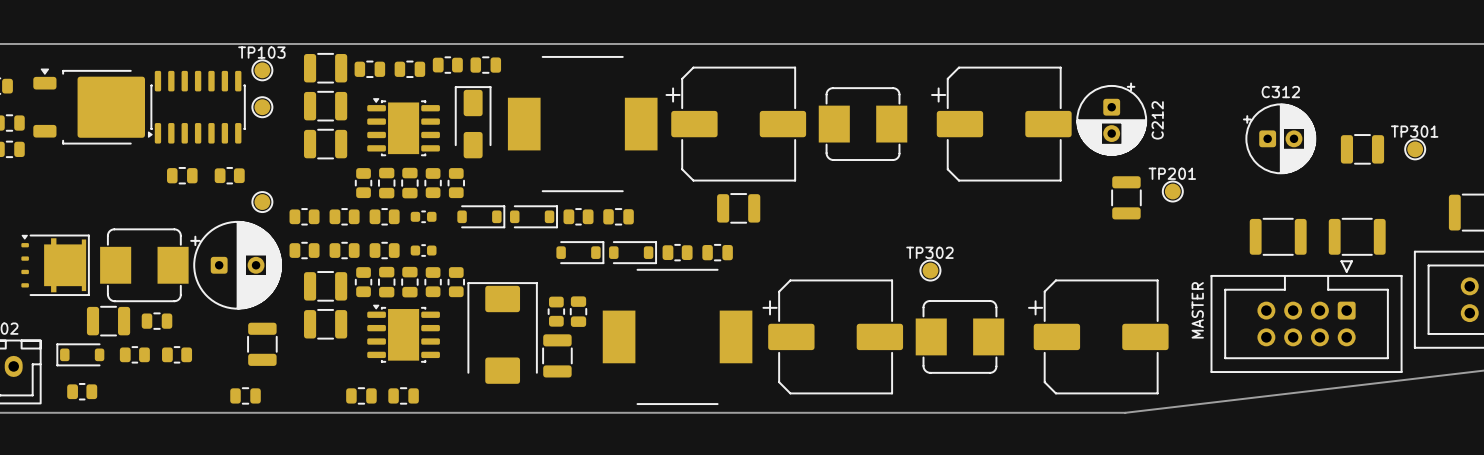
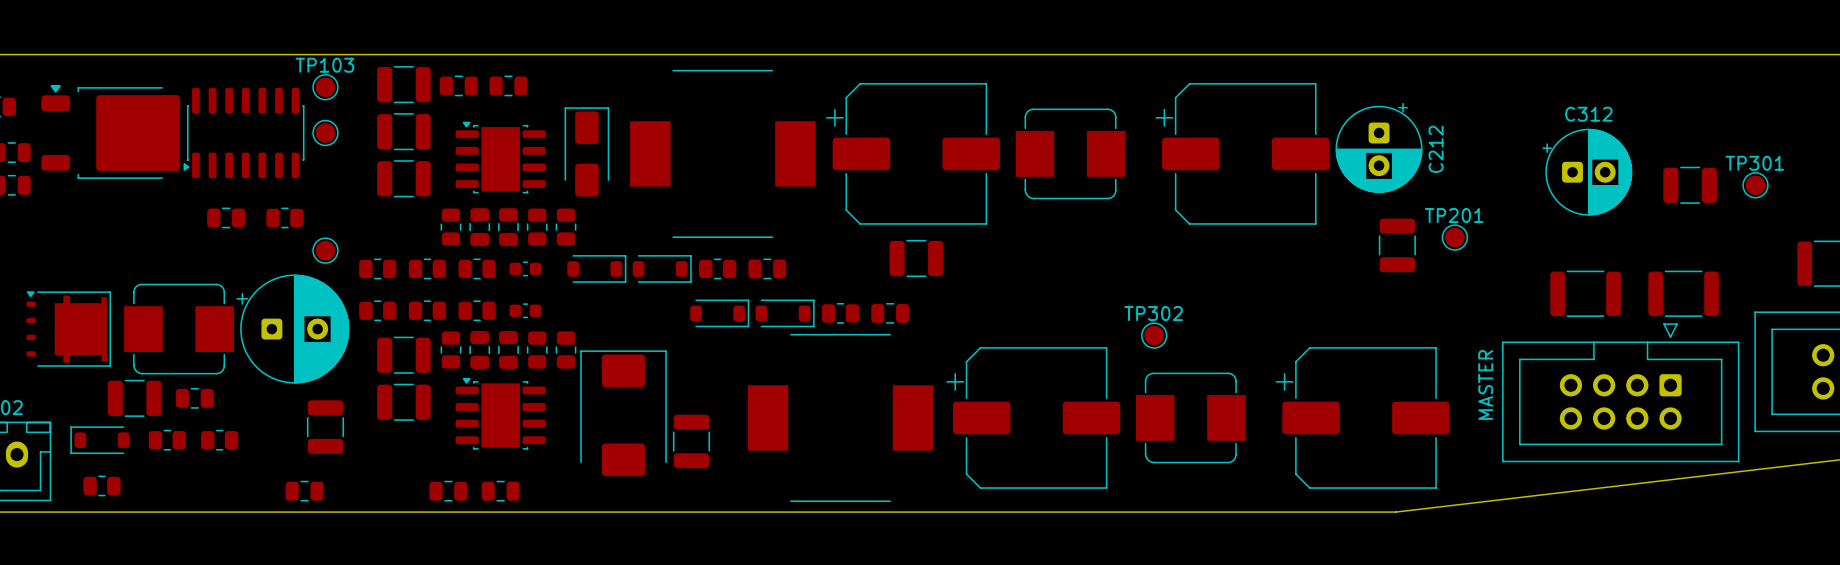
part: (447, 65) -> none
part: (485, 65) -> none
part: (556, 311) -> none
part: (578, 311) -> none

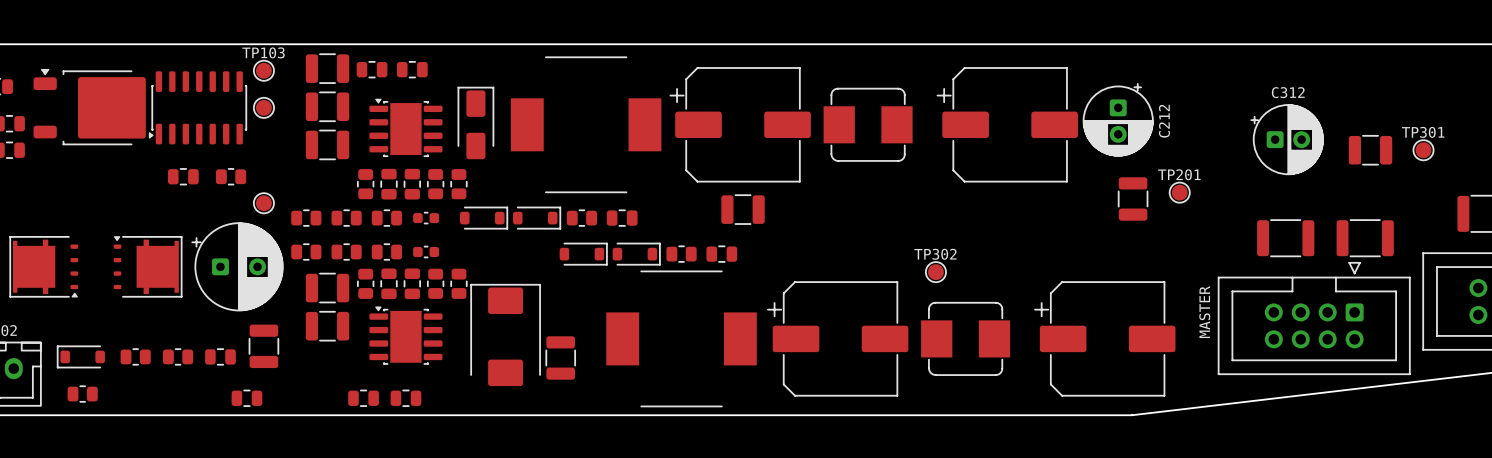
part footprint: [124, 283, 234, 375] -> [113, 236, 183, 298]
part rotation: 0° (68, 329) -> 180° (43, 266)
part: (134, 398) -> none
part position: (194, 398) -> (220, 356)

